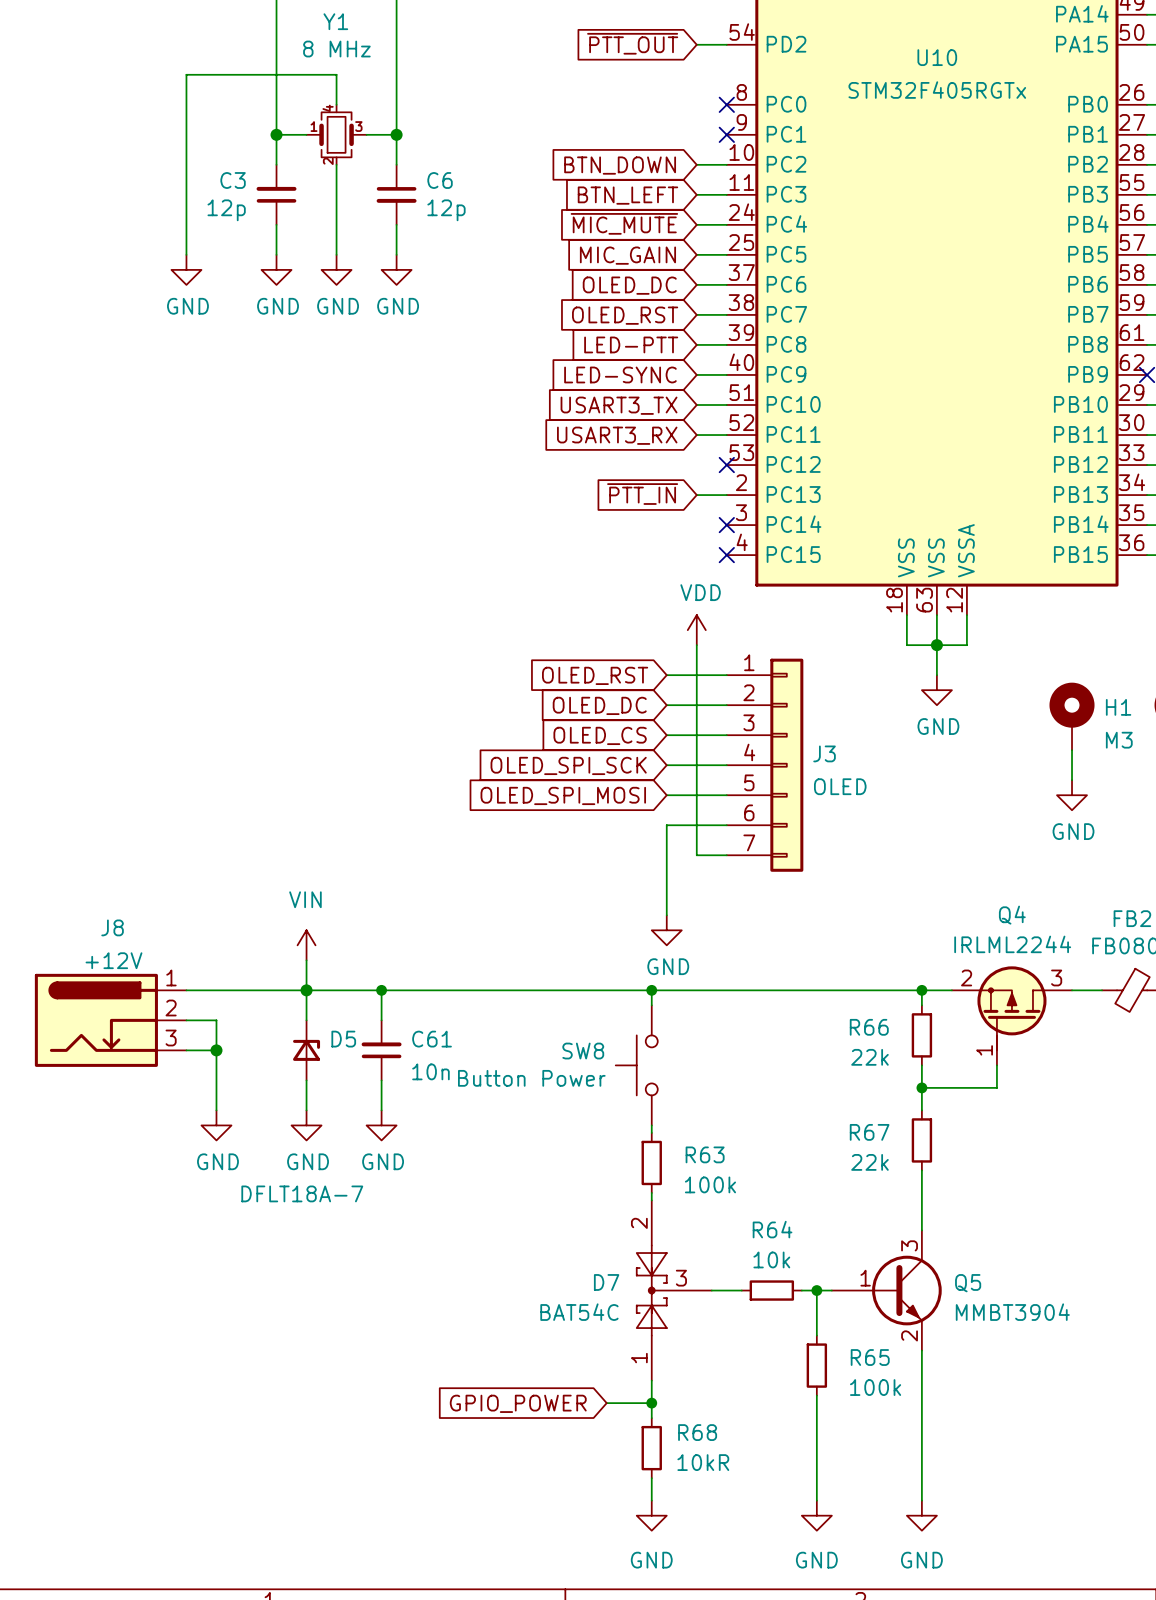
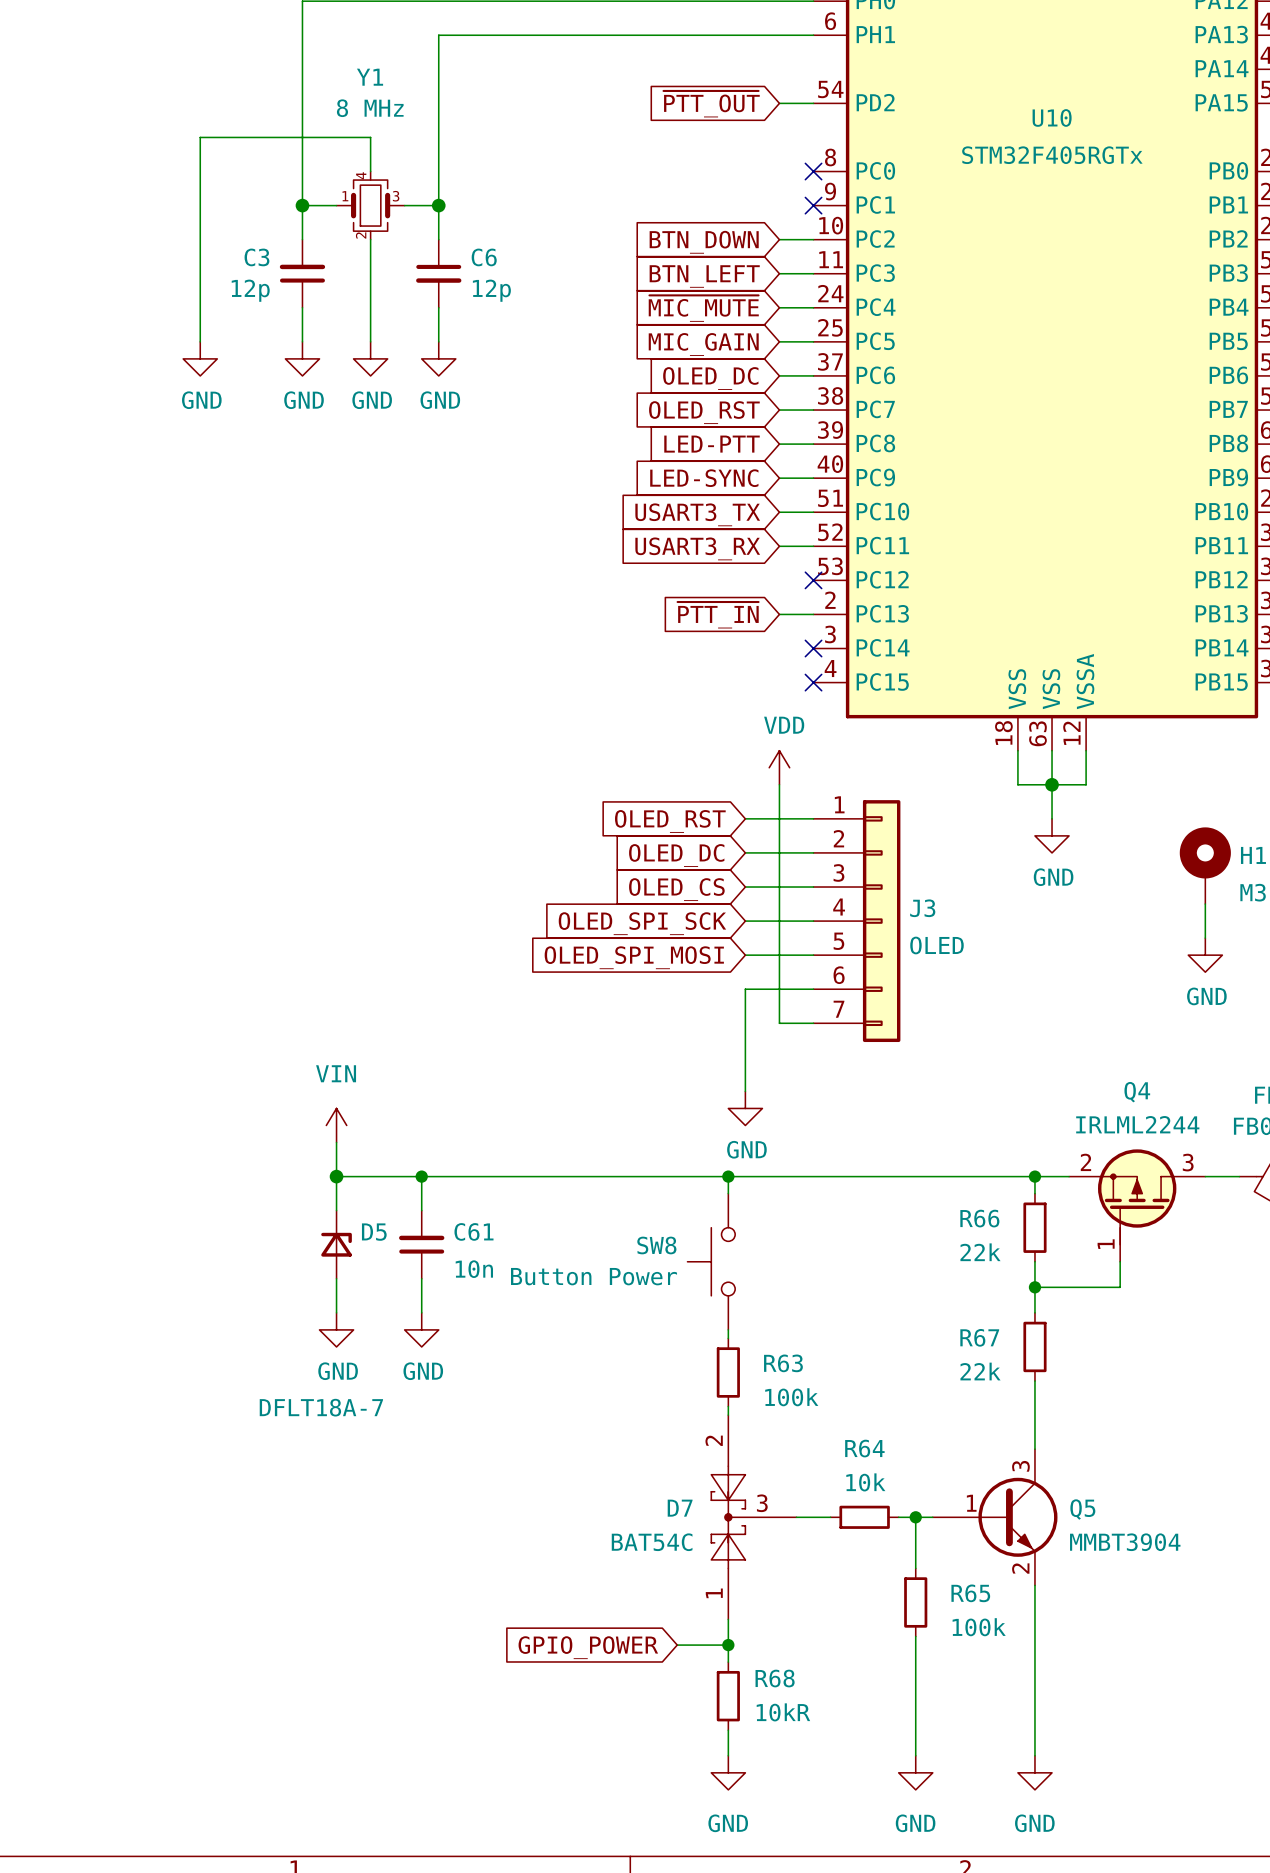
wire: (186, 990) (306, 990) -> none
J8: +12V (110, 1020) -> none
wire: (186, 1020) (216, 1020) (216, 1110) -> none
wire: (186, 1050) (216, 1050) -> none
junction: (216, 1050) -> none
power symbol: GND (216, 1125) -> none

